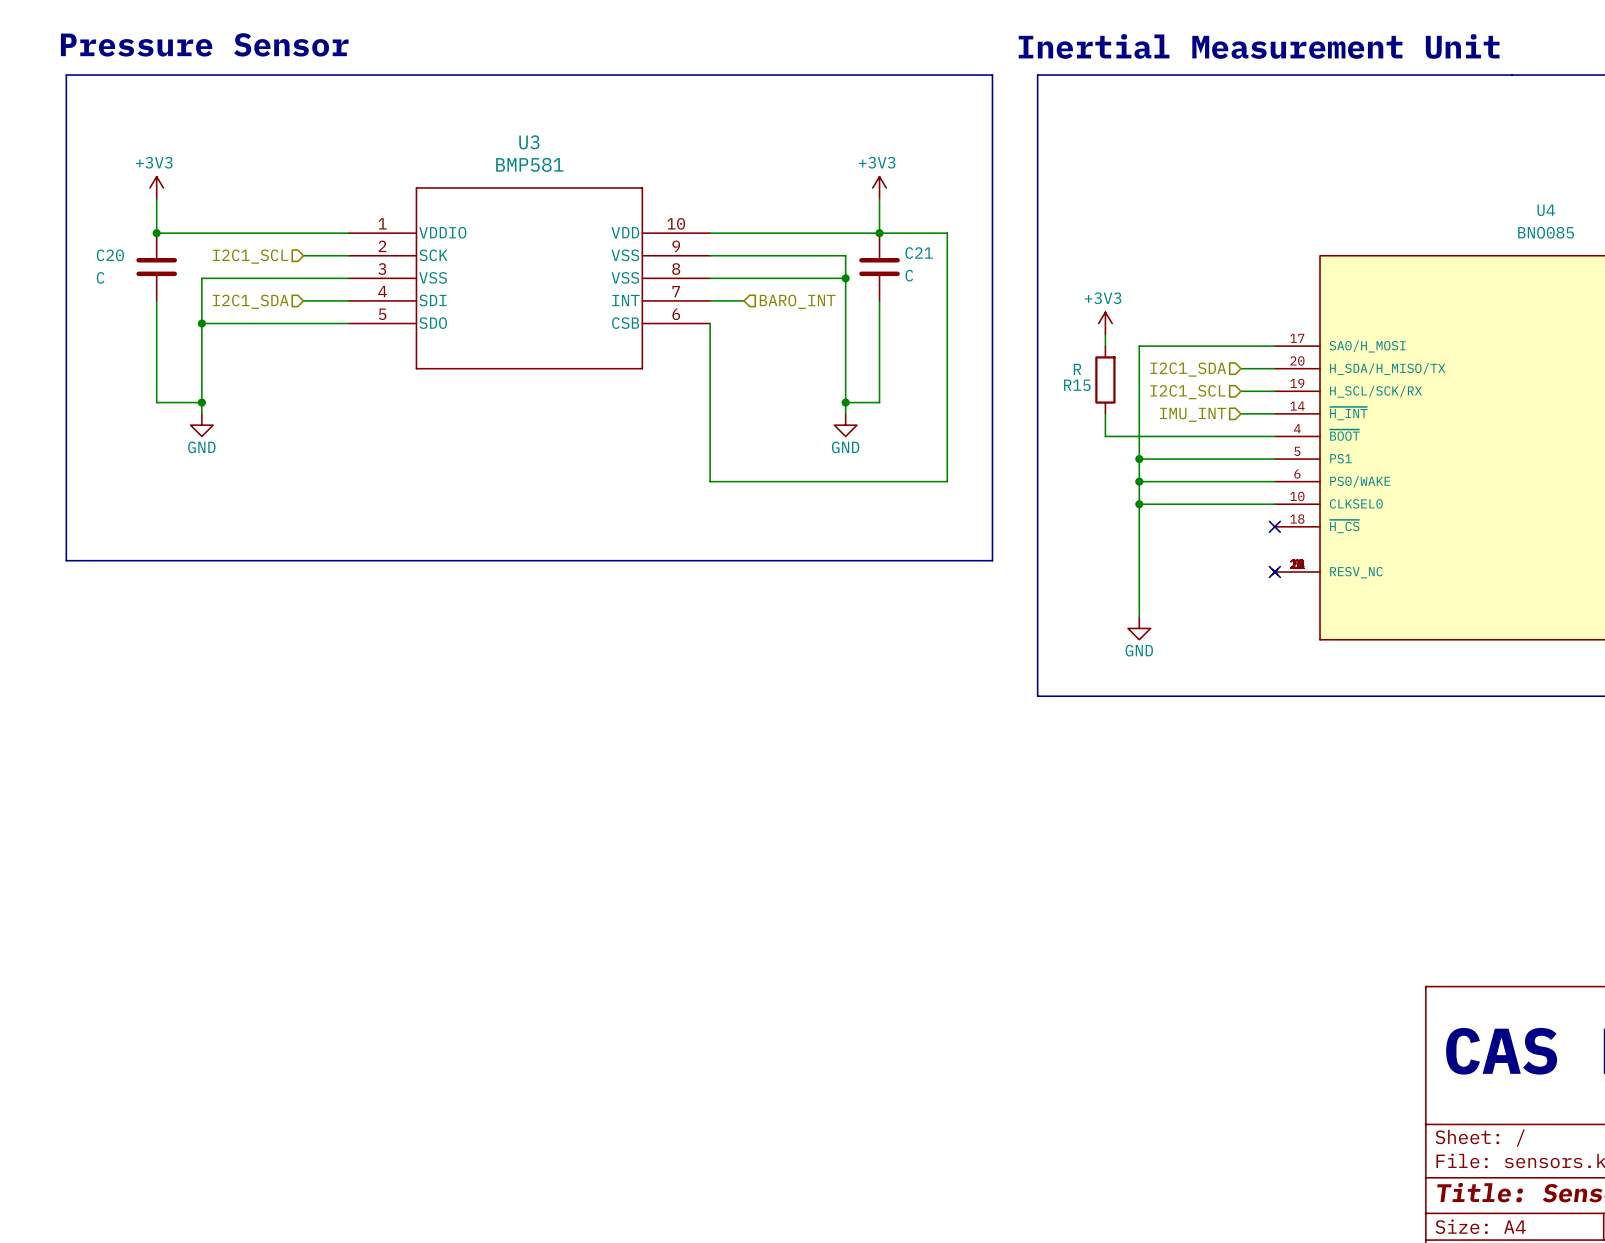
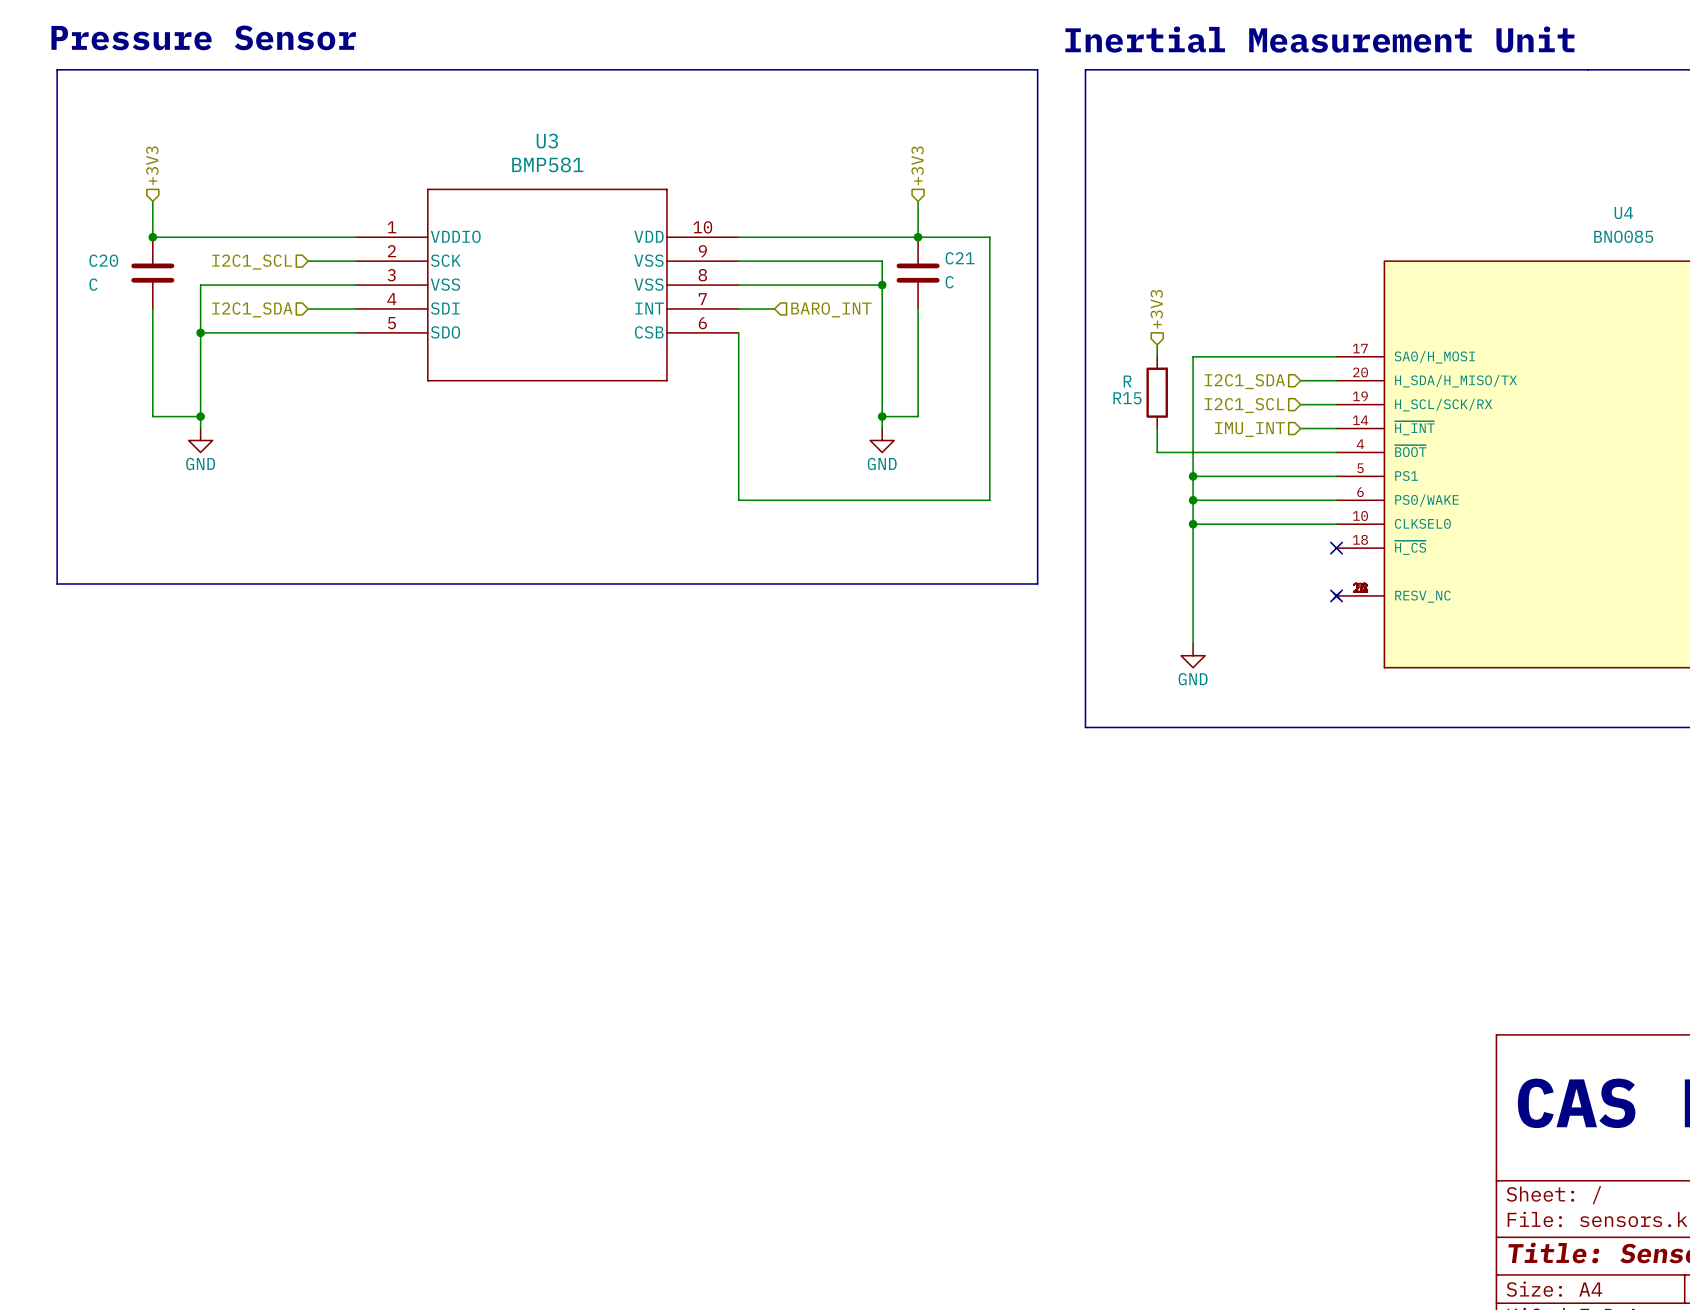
hierarchical label: none -> +3V3 (152, 165)
hierarchical label: none -> +3V3 (917, 165)
power symbol: +3V3 (156, 187) -> none
power symbol: +3V3 (879, 187) -> none
hierarchical label: none -> +3V3 (1156, 309)
power symbol: +3V3 (1105, 323) -> none

